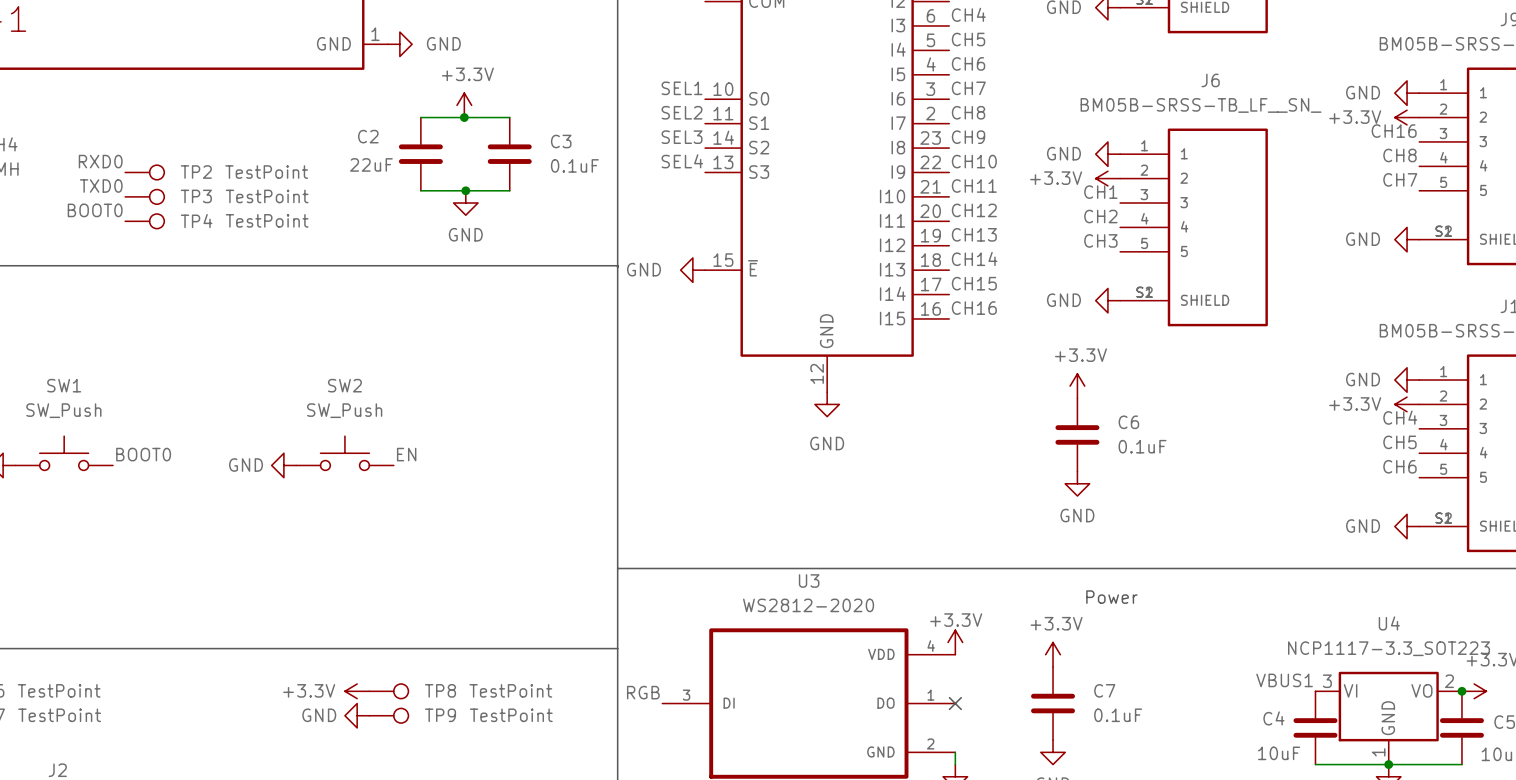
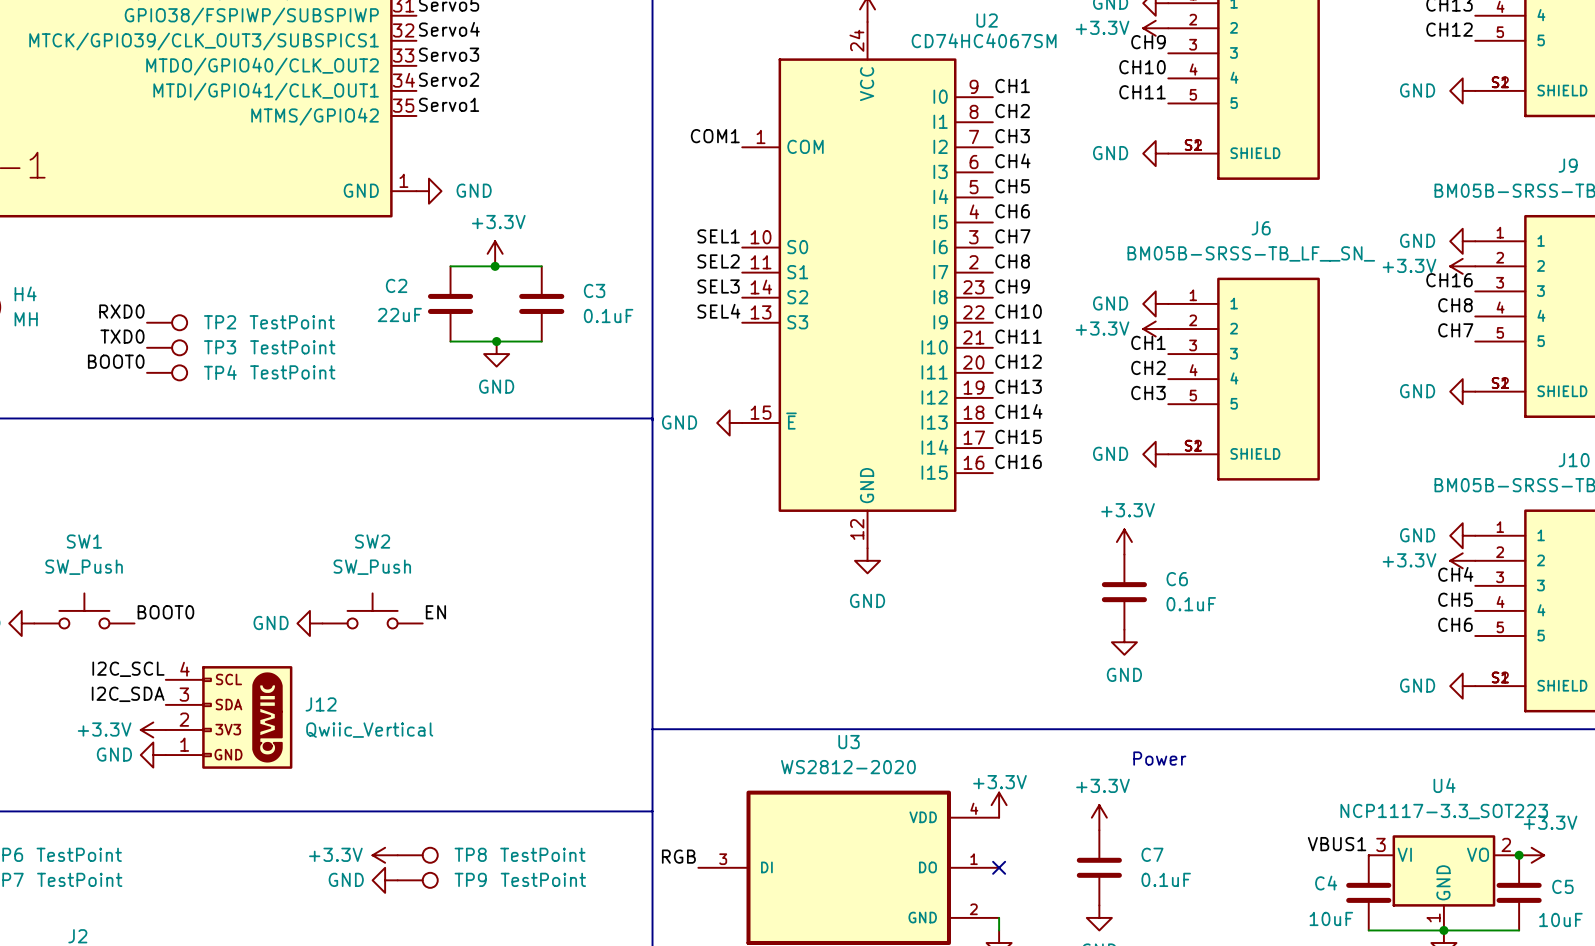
label: none -> I2C_SCL (128, 669)
label: none -> I2C_SDA (128, 694)
J12: none -> Qwiic_Vertical (229, 717)
power symbol: none -> +3.3V (153, 729)
power symbol: none -> GND (153, 755)

